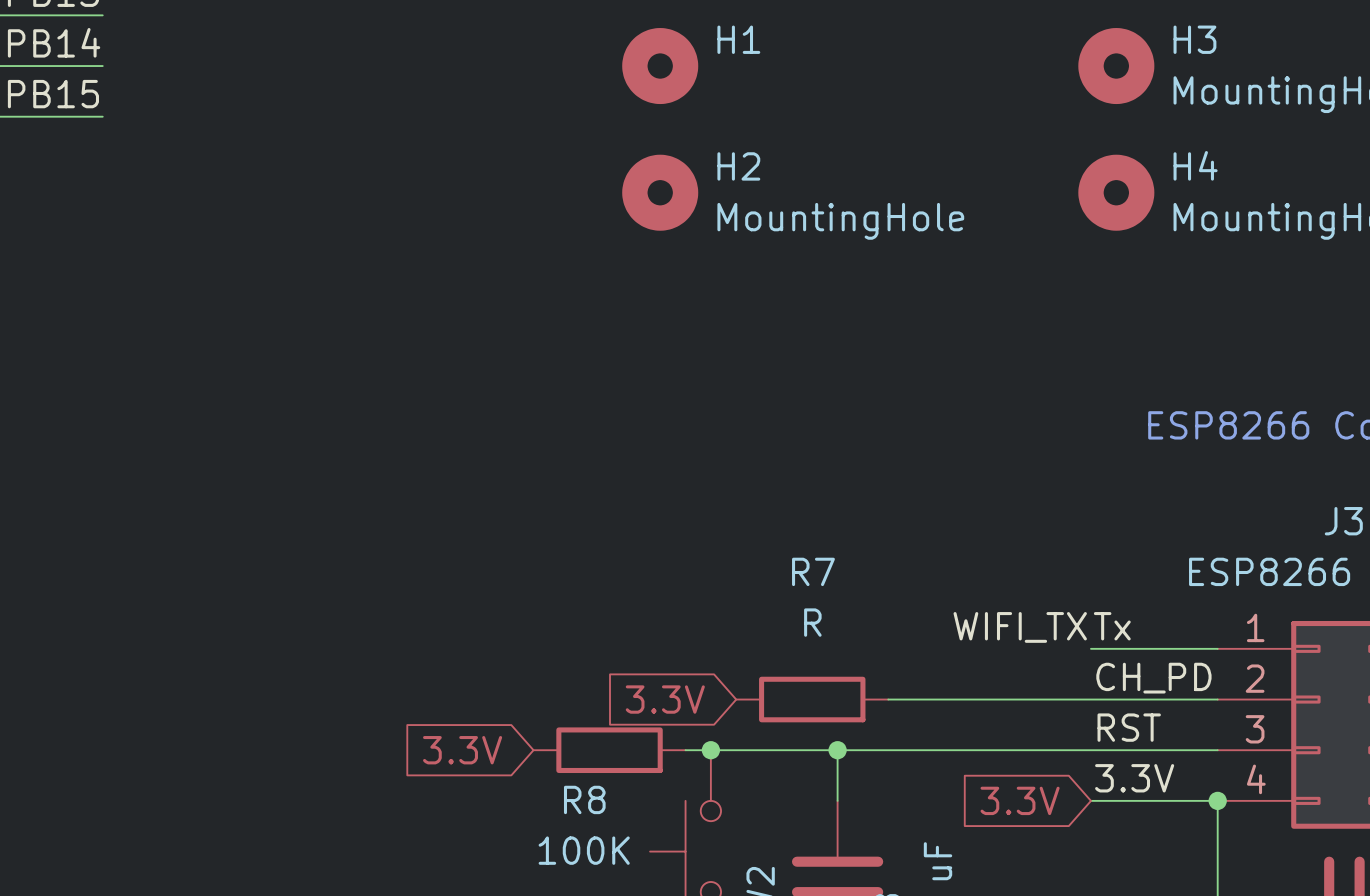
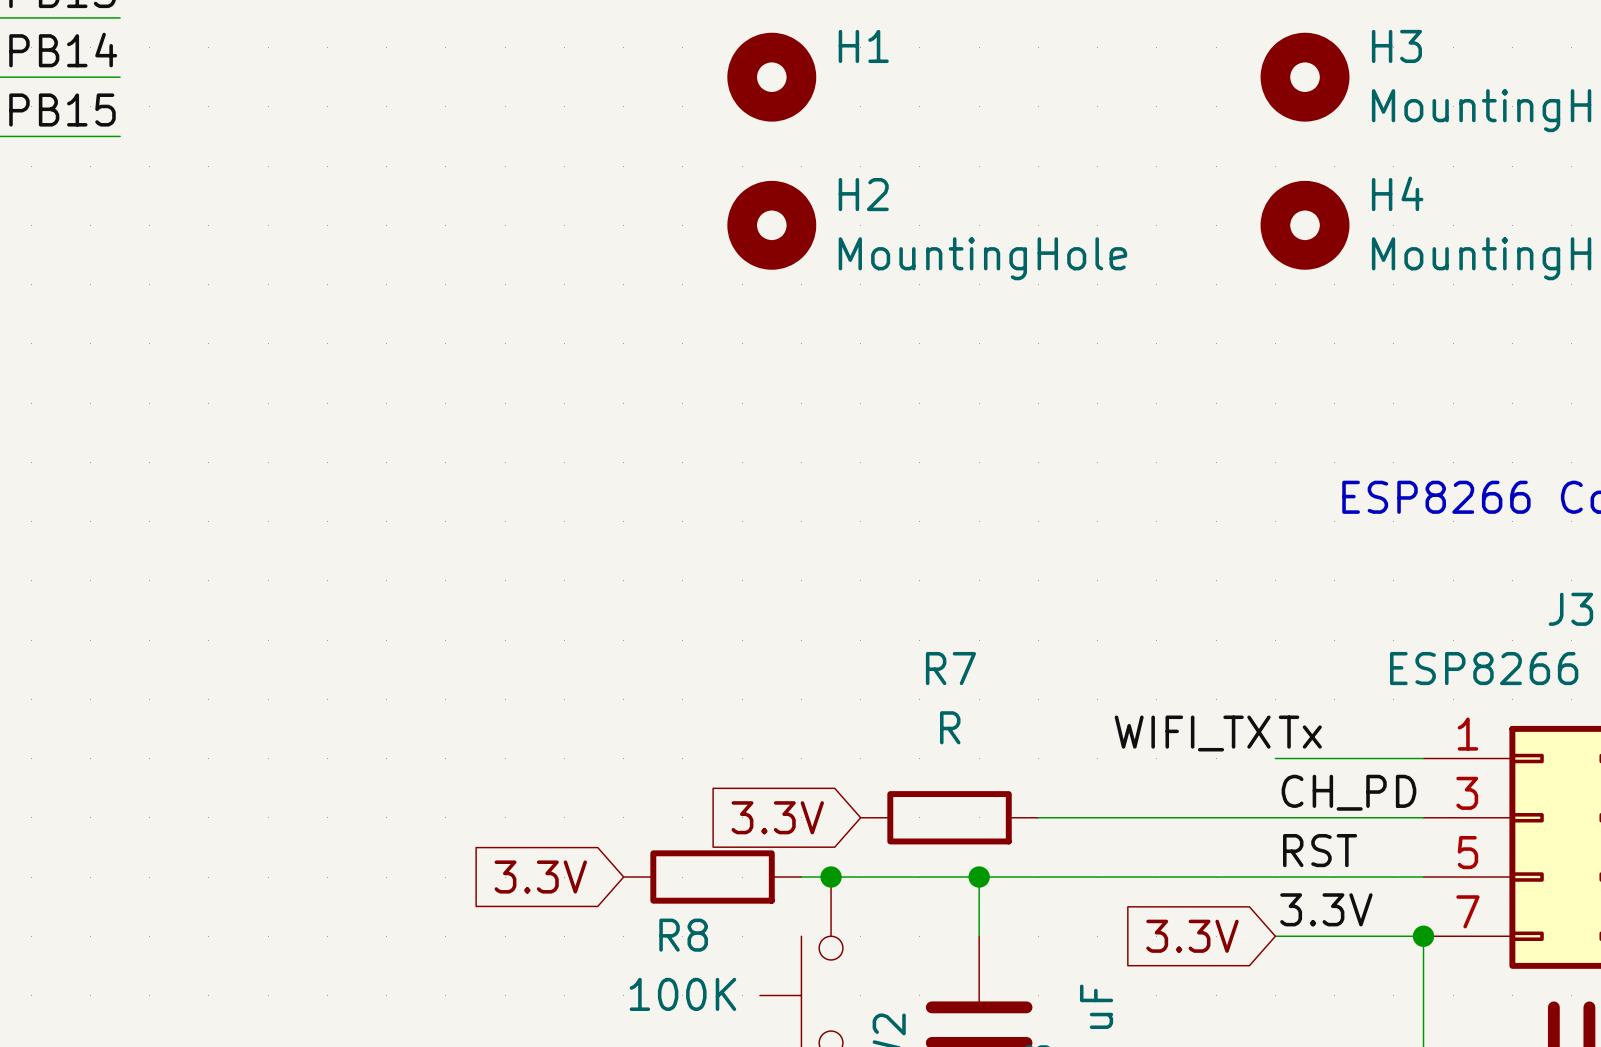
J3 pin number: 2 (1255, 678) -> 3 (1467, 793)
J3 pin number: 3 (1255, 729) -> 5 (1467, 852)
J3 pin number: 4 (1256, 779) -> 7 (1467, 911)

